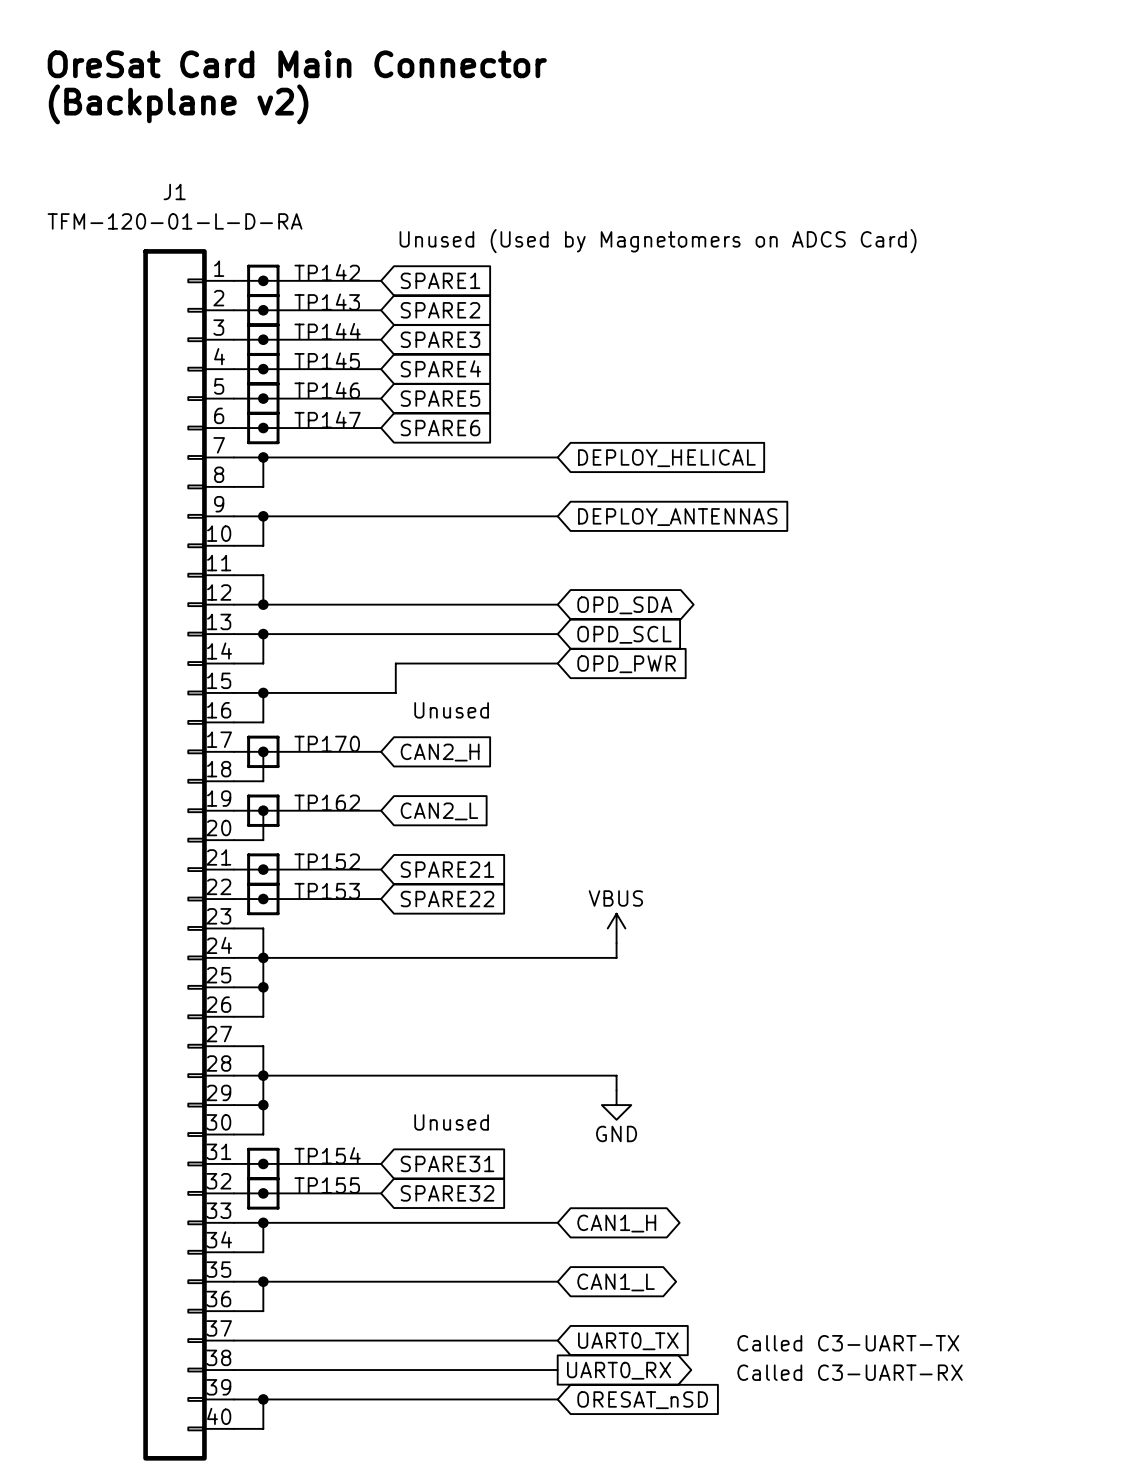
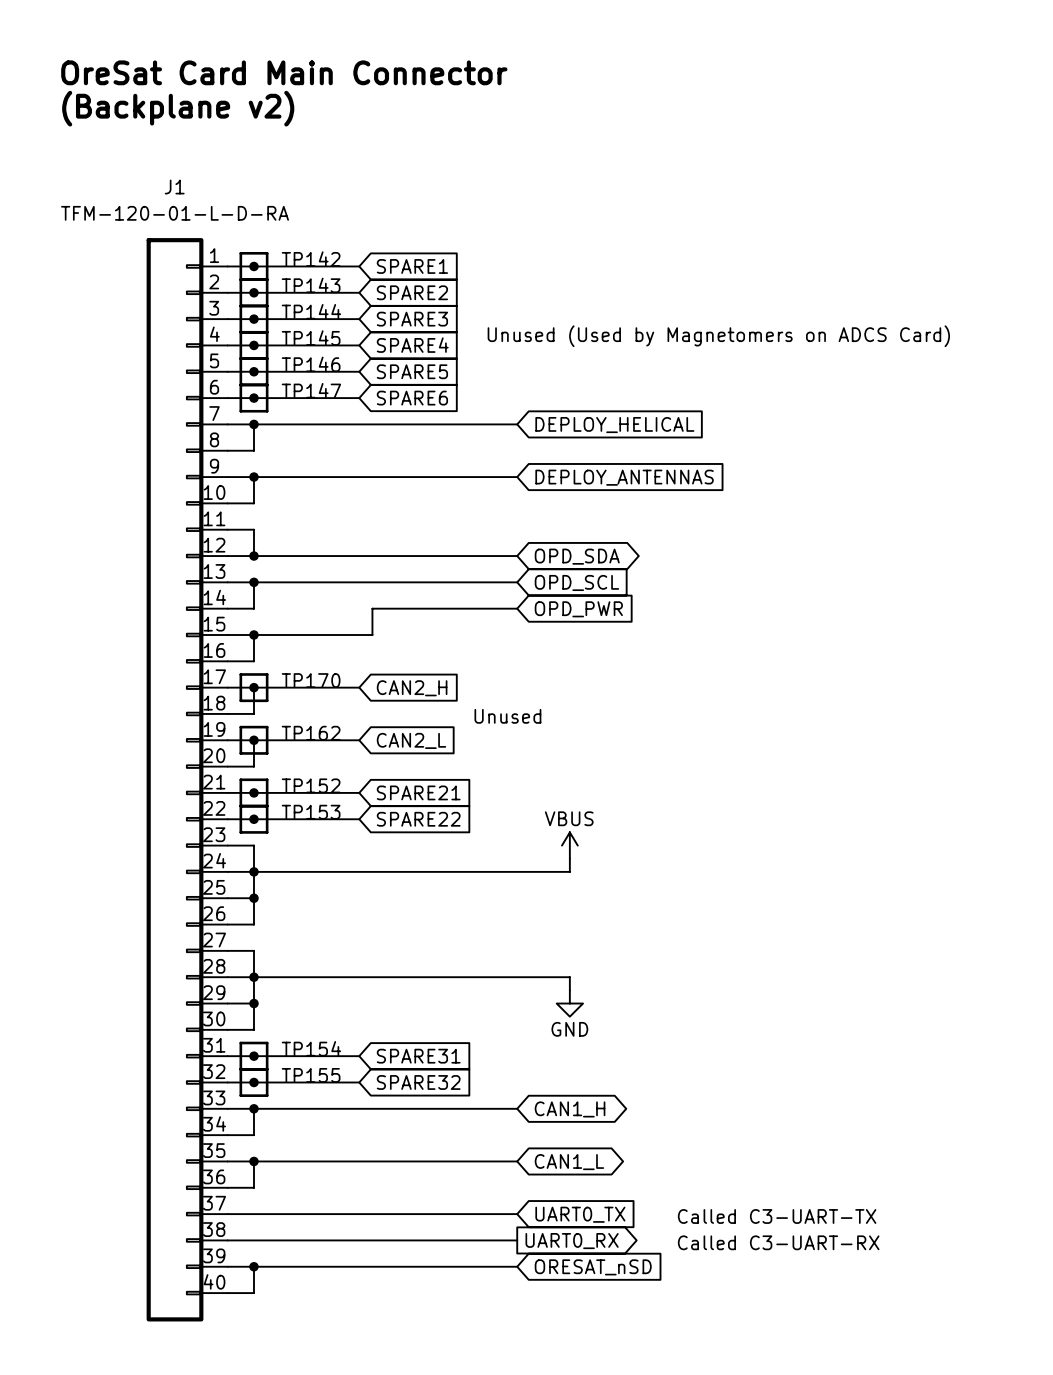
text position: Unused (Used by Magnetomers on ADCS Card) (658, 241) -> Unused (Used by Magnetomers on ADCS Card) (718, 336)
text position: Unused (451, 710) -> Unused (507, 716)
text: Unused (451, 1122) -> none

